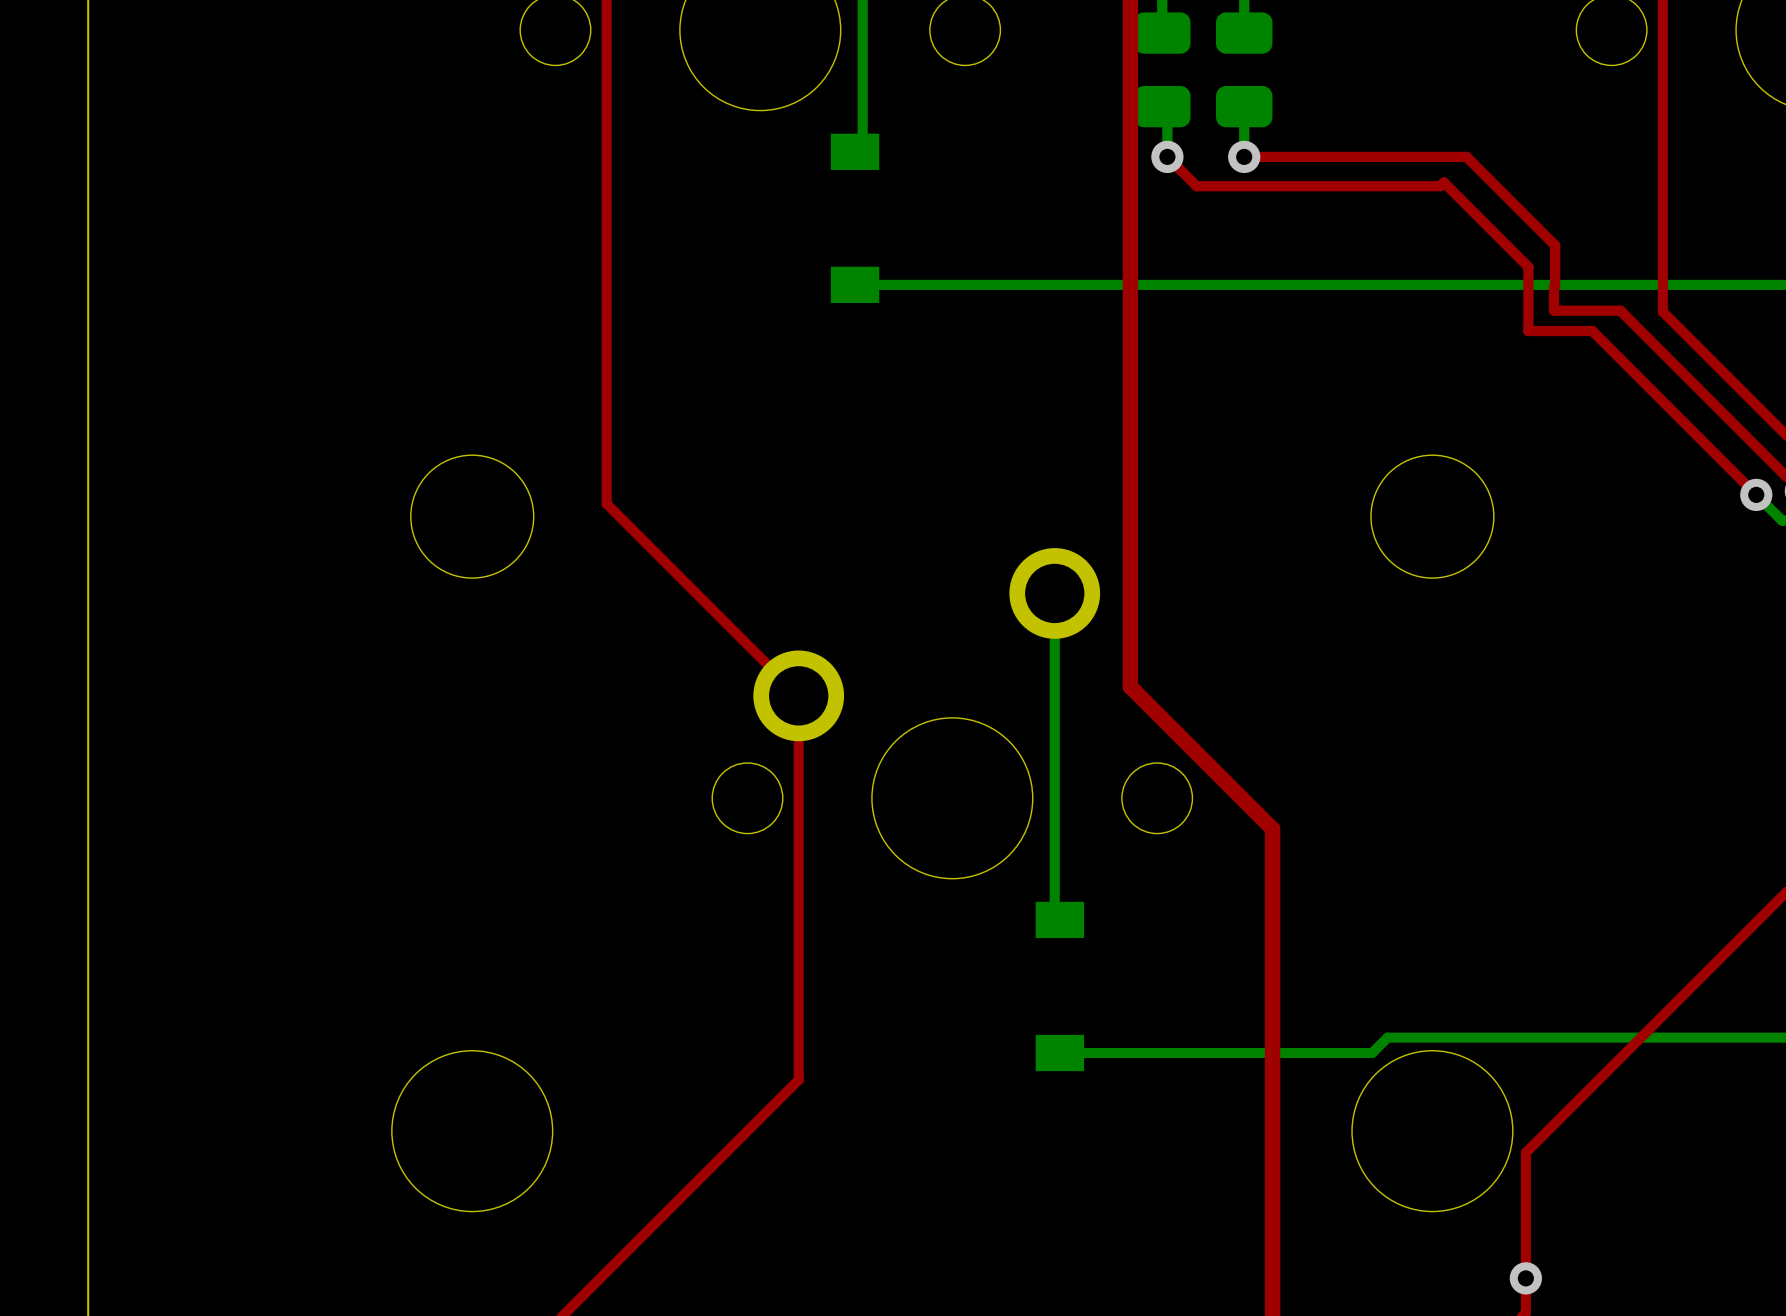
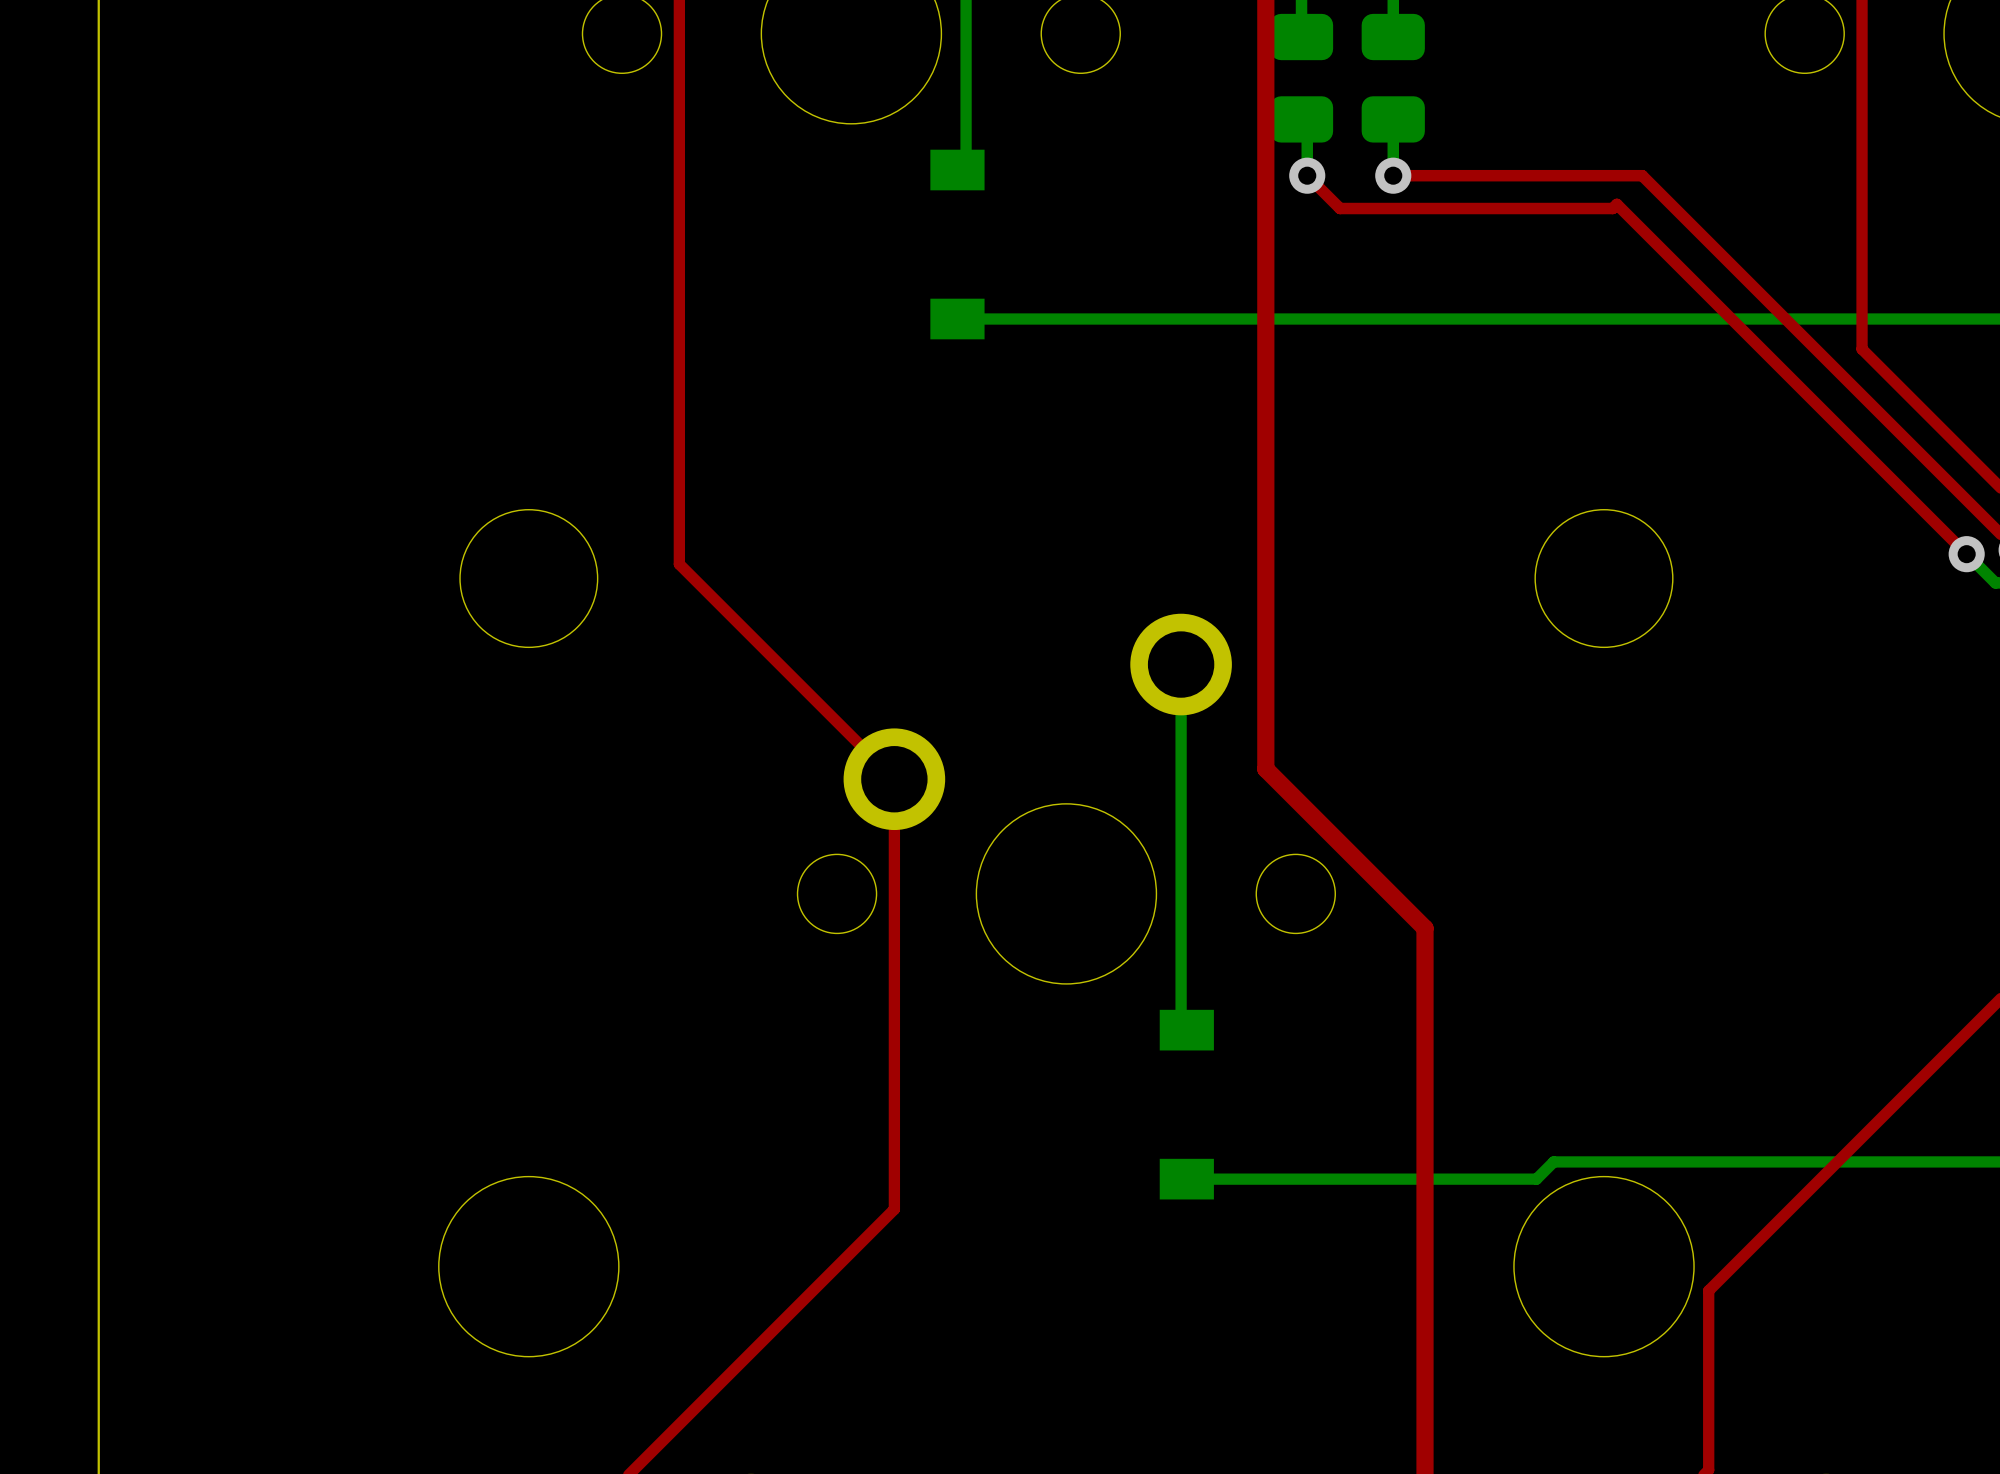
top track: (1555, 245) (1554, 310) (1620, 310) -> (1741, 274) (1814, 347)
top track: (1528, 267) (1528, 331) (1592, 331) -> (1711, 298) (1783, 370)
via: (1525, 1278) -> none

